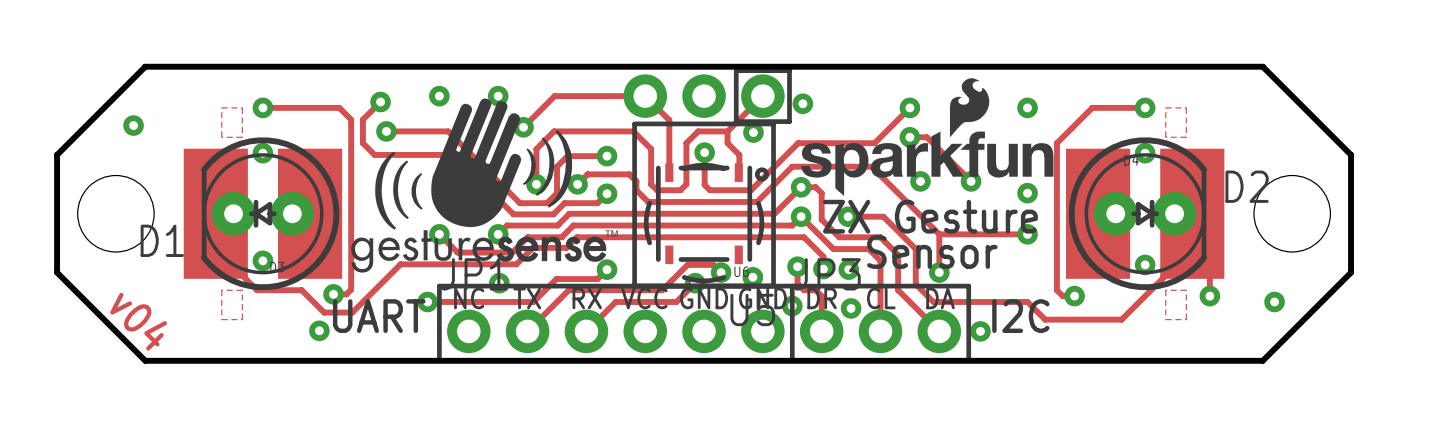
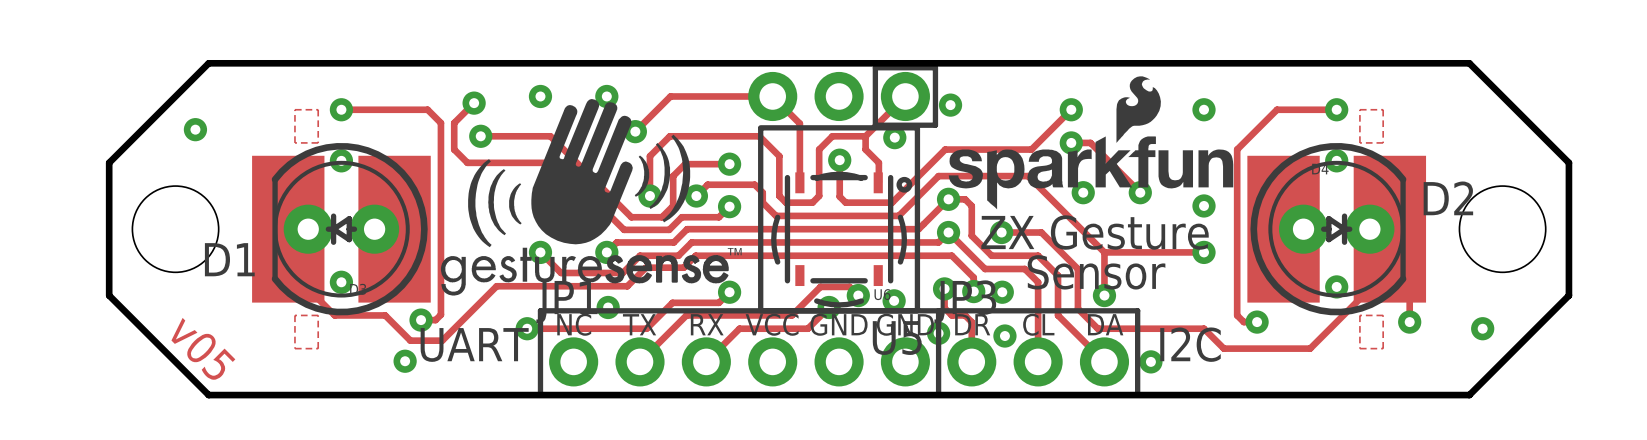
text: v04 (138, 321) -> v05 (203, 348)

